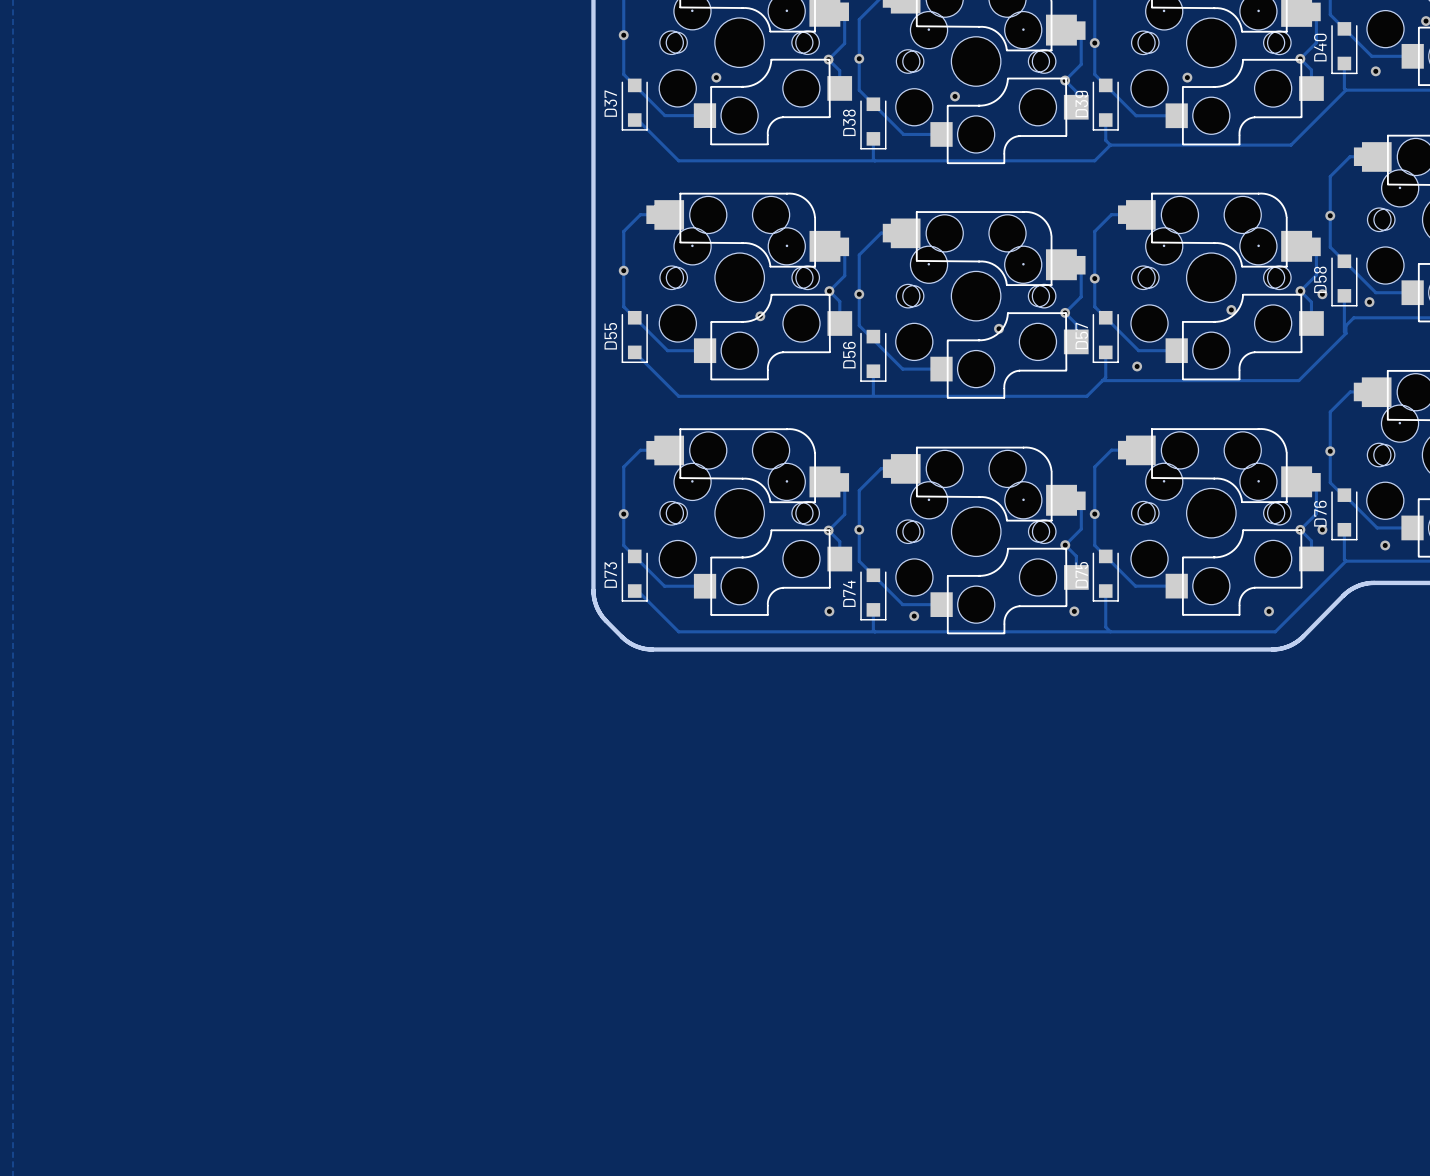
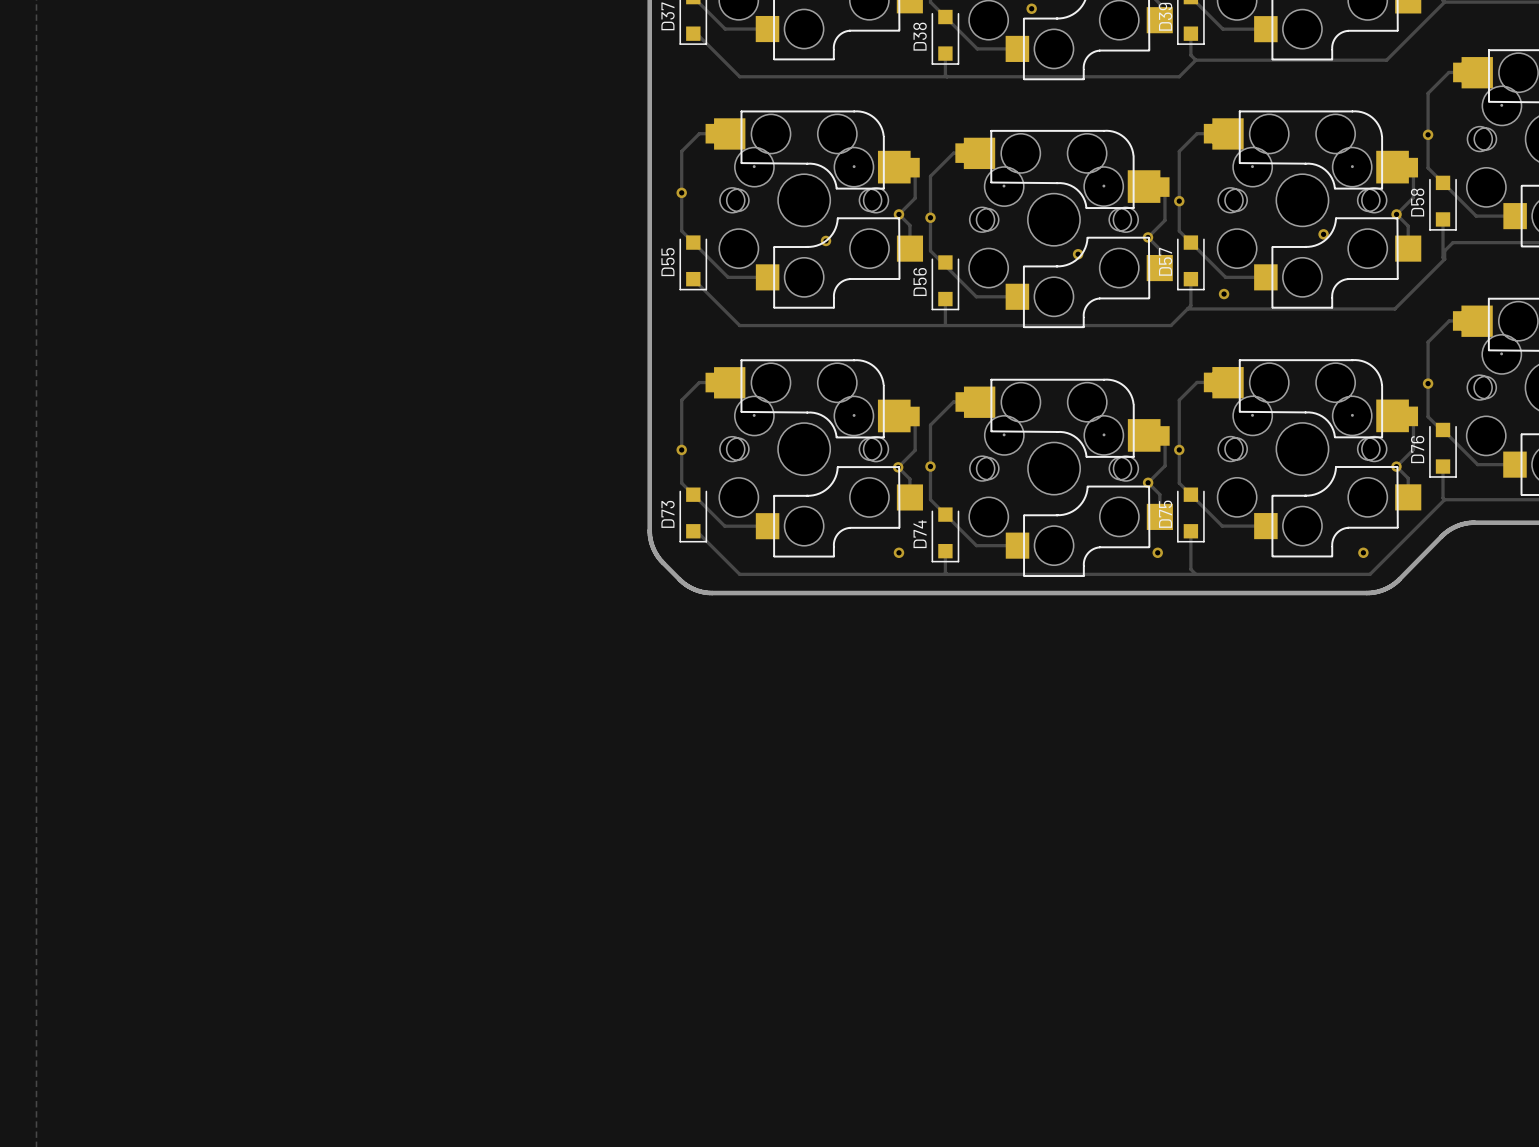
via: (1322, 294) -> none
via: (1369, 302) -> none
via: (1322, 529) -> none
via: (1385, 545) -> none
via: (914, 616) -> none

